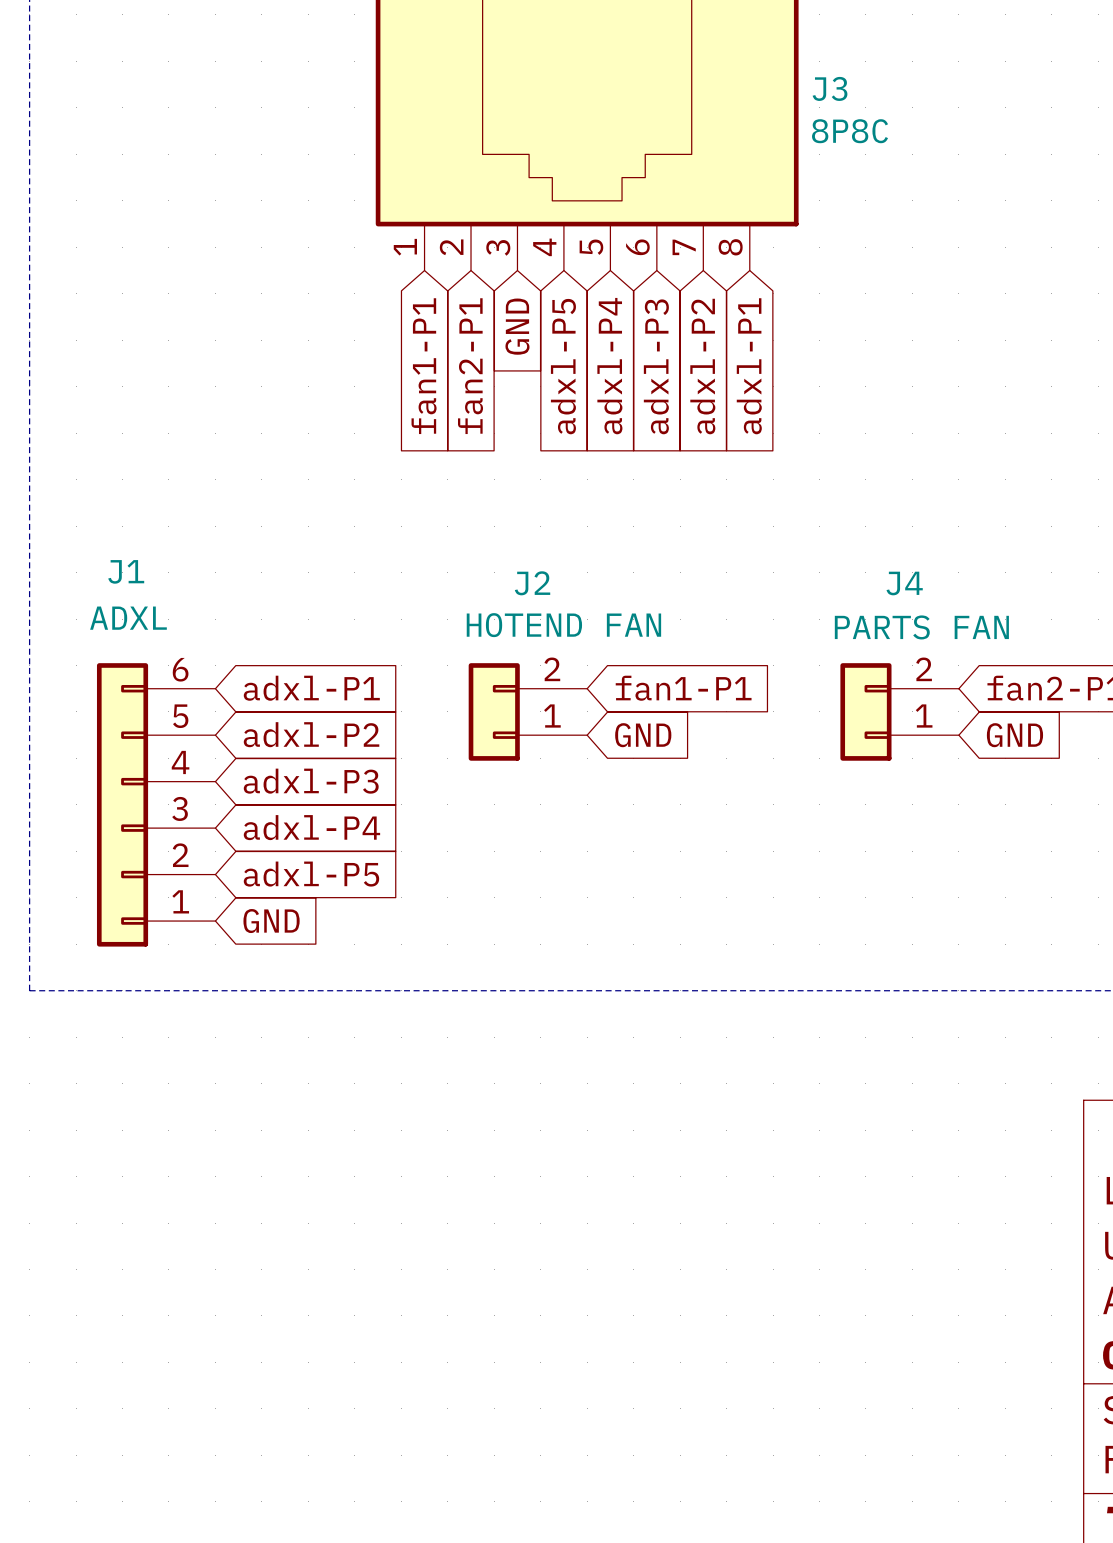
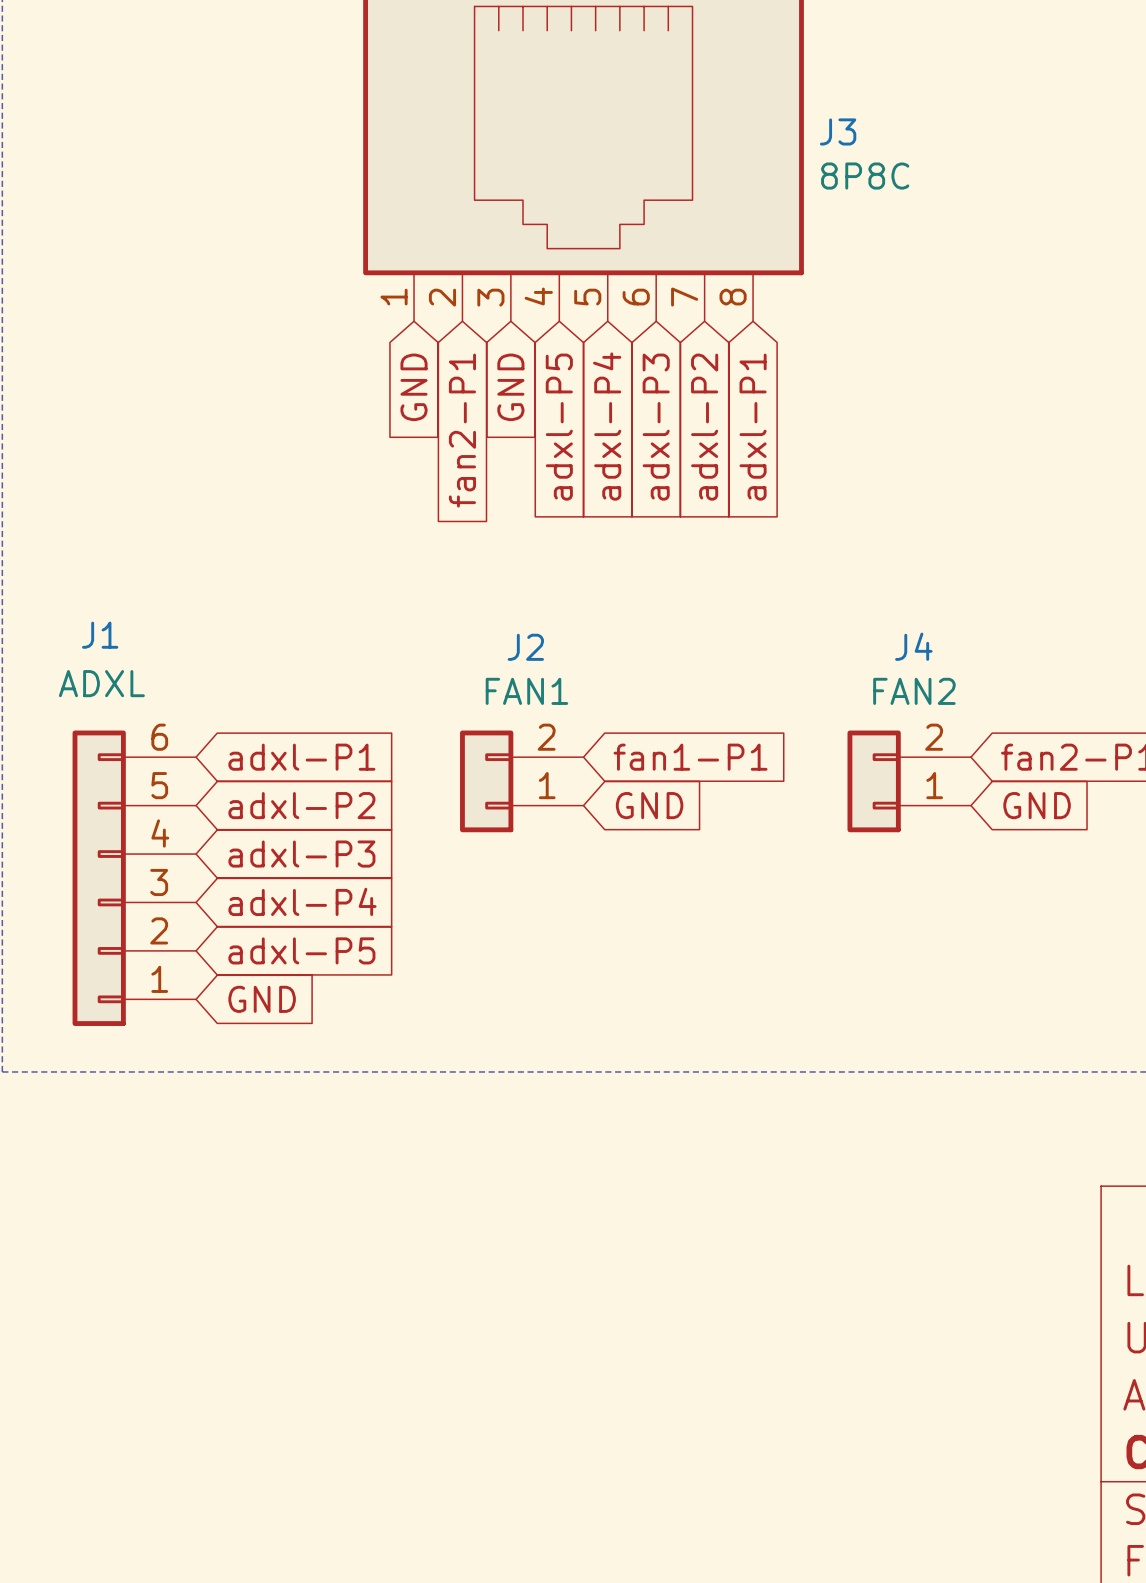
global label: fan1-P1 (424, 366) -> GND (414, 387)
J2 value: HOTEND FAN (563, 625) -> FAN1 (526, 691)
J4 value: PARTS FAN (921, 627) -> FAN2 (914, 691)

